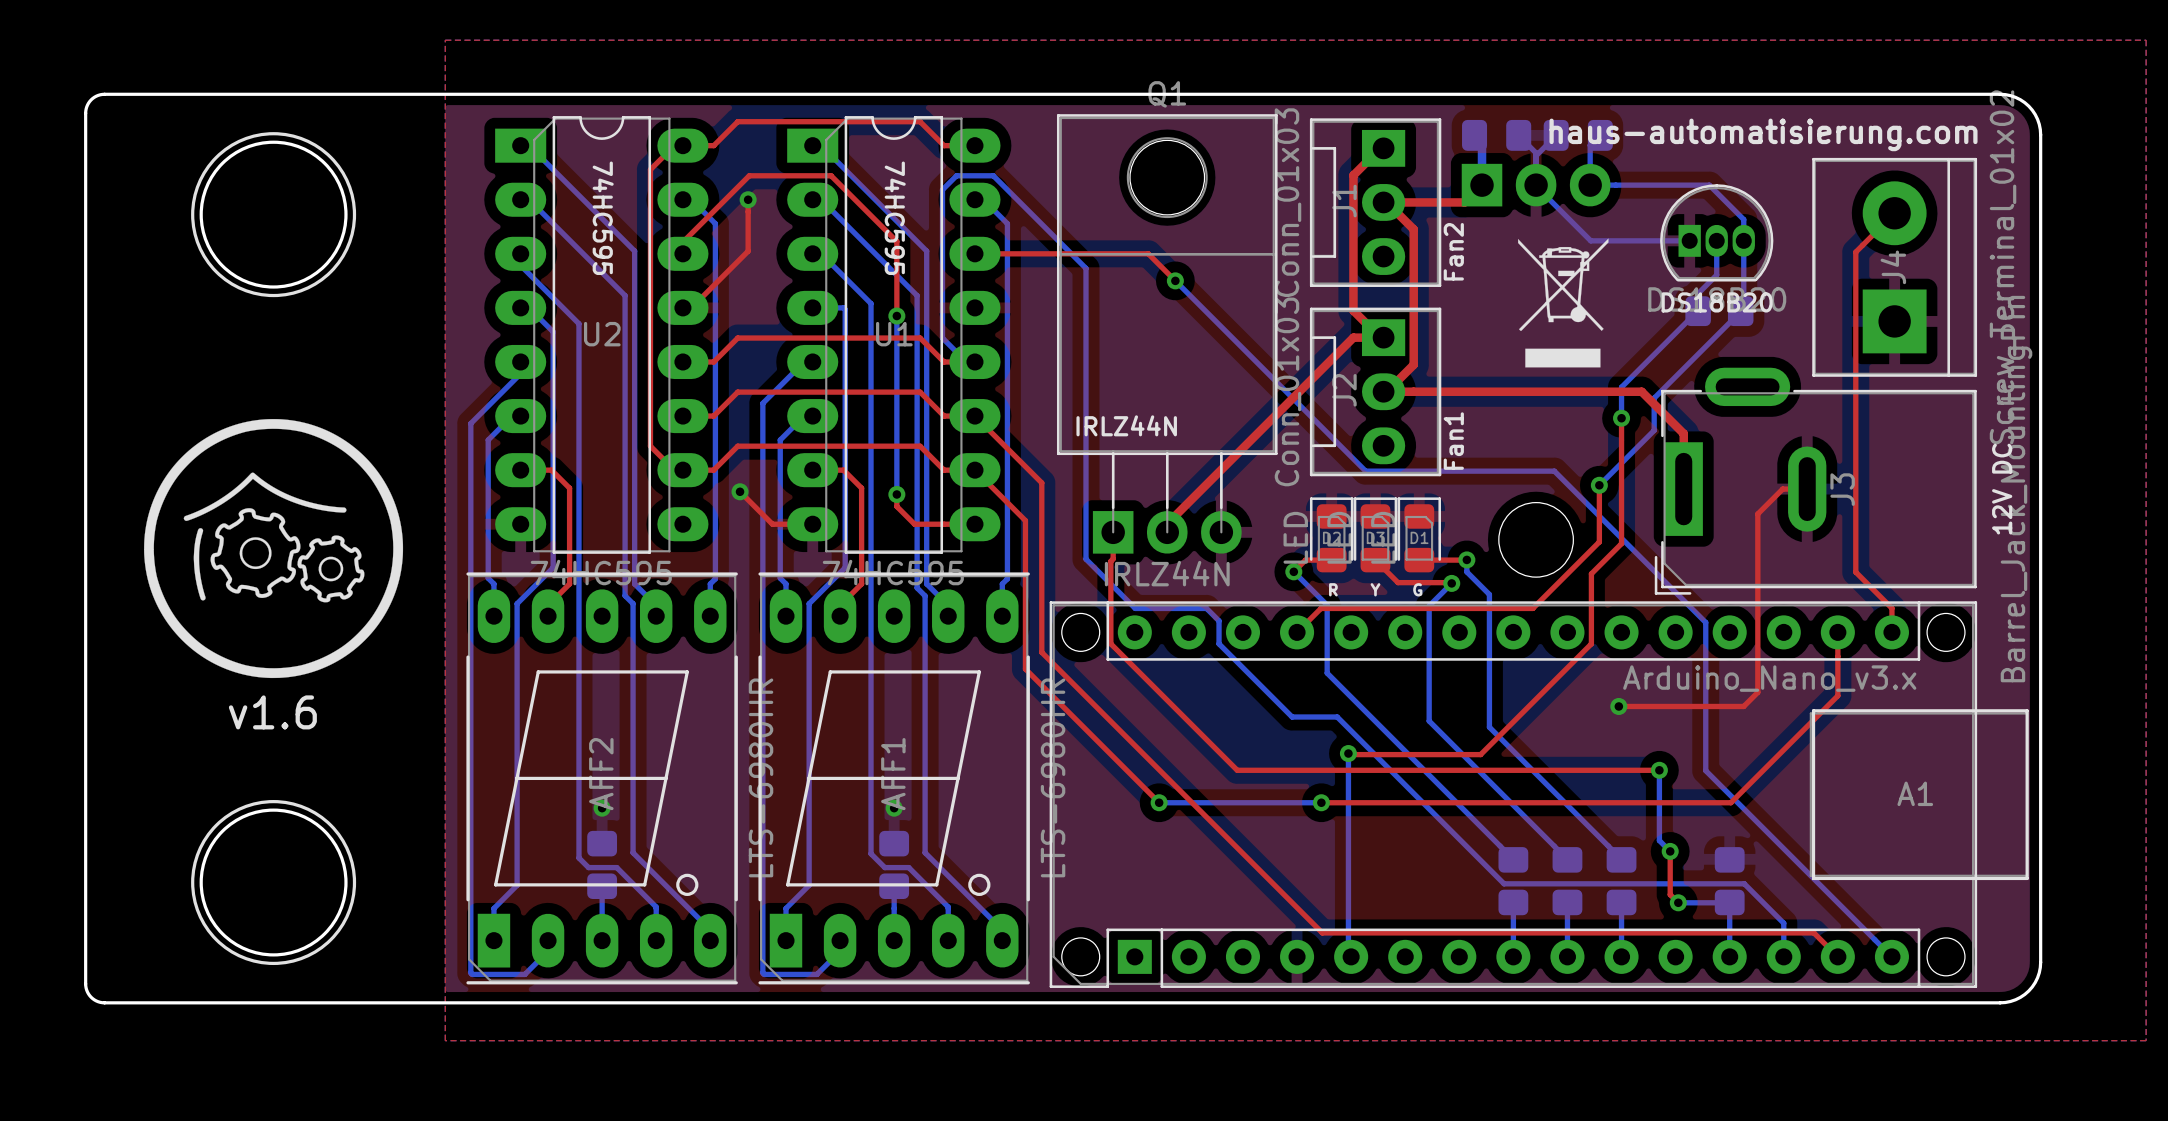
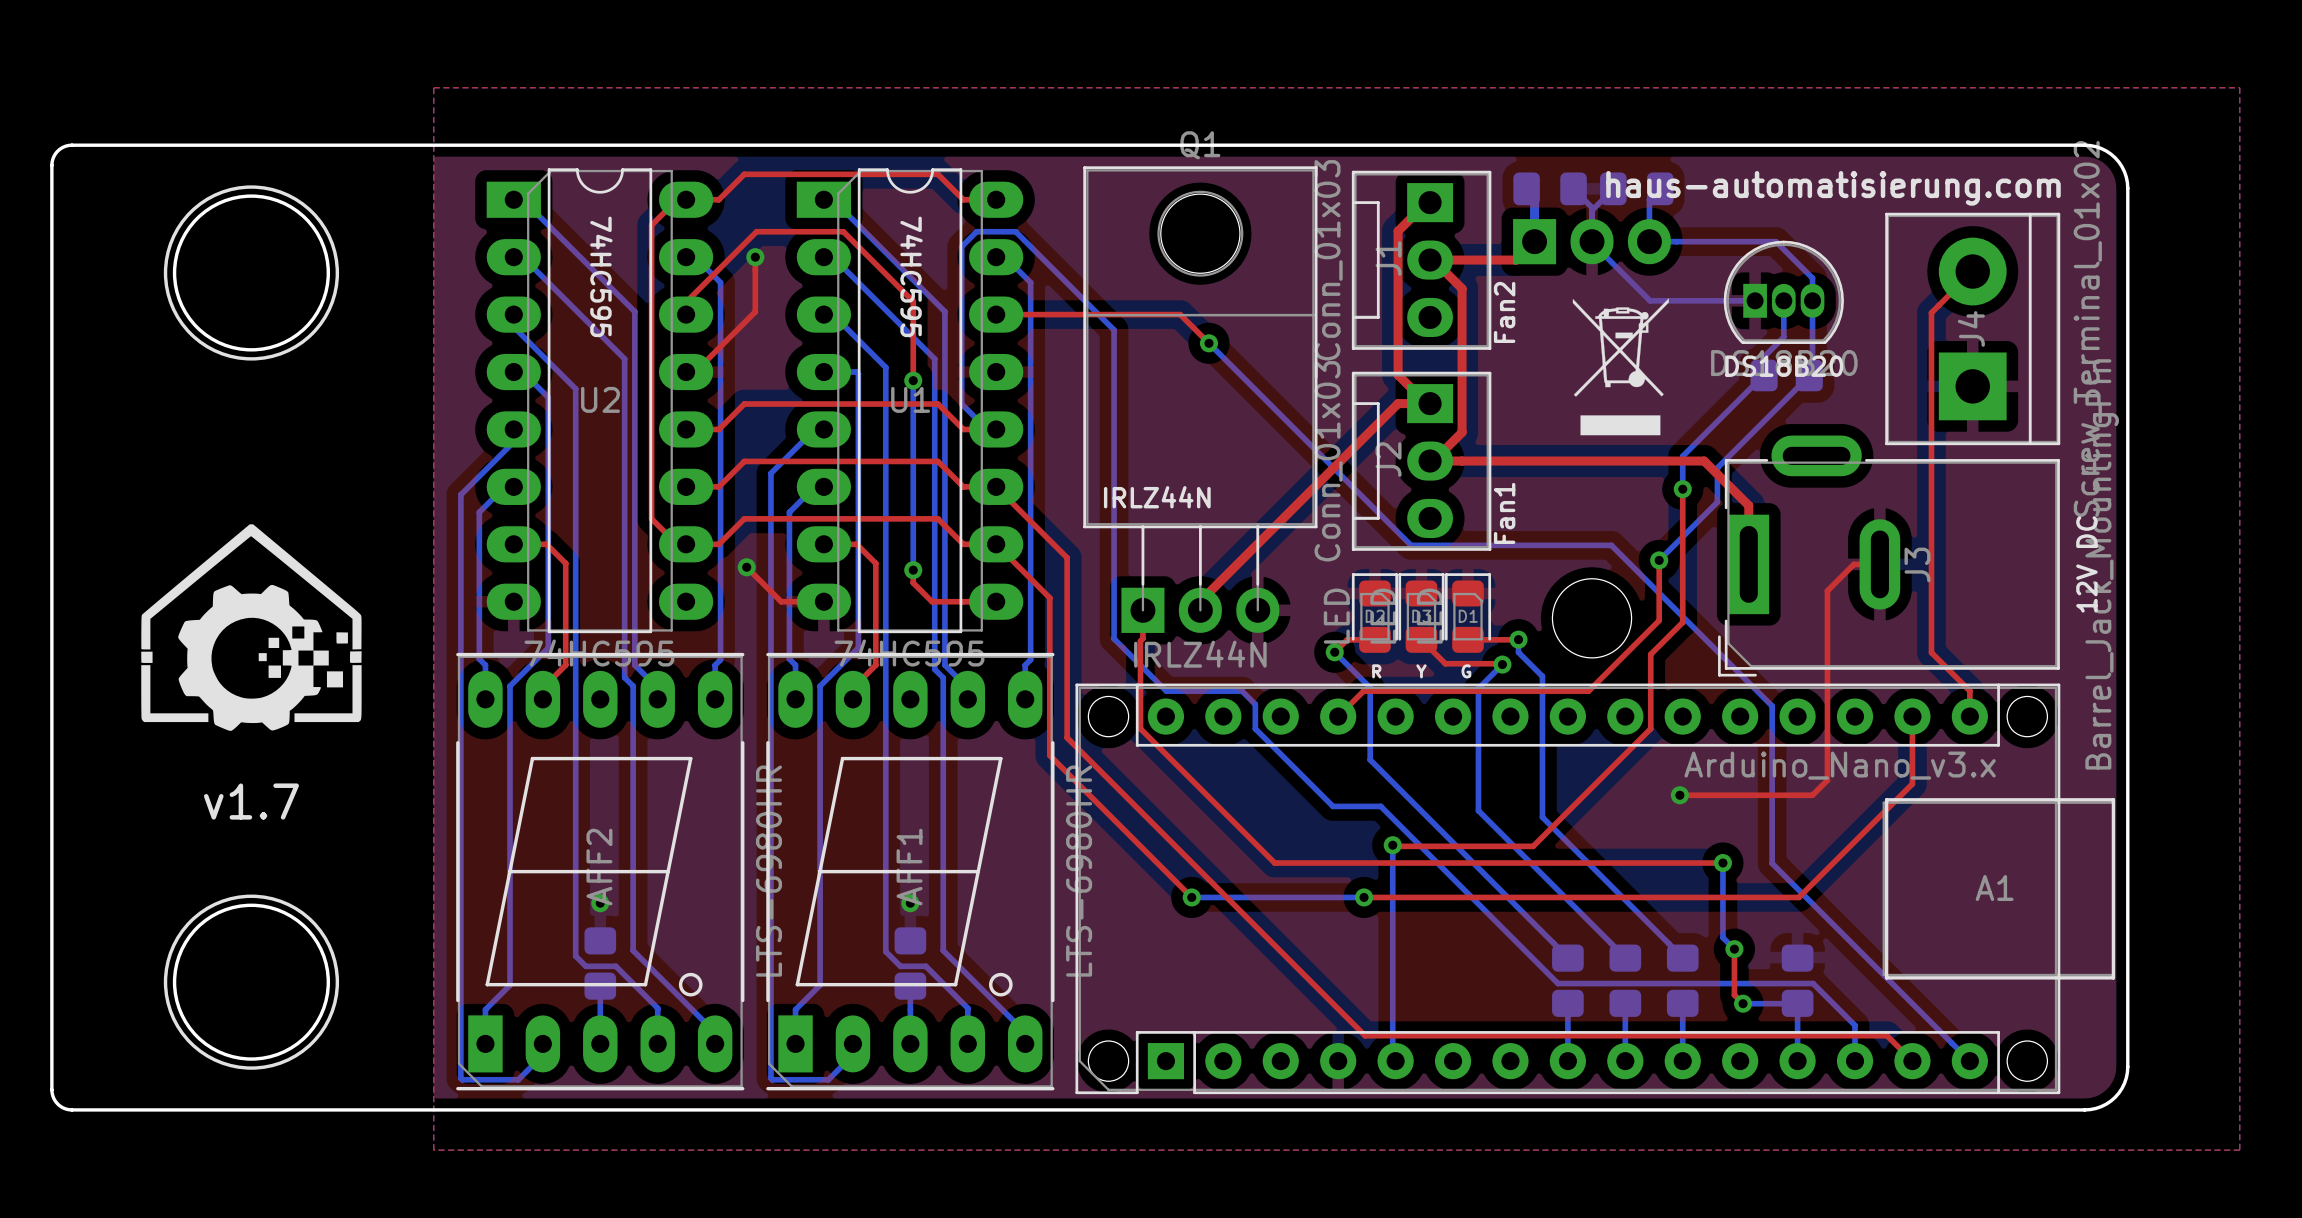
drawing shape: [144, 419, 404, 679] -> [141, 524, 362, 731]
text: v1.6 (272, 712) -> v1.7 (251, 801)

